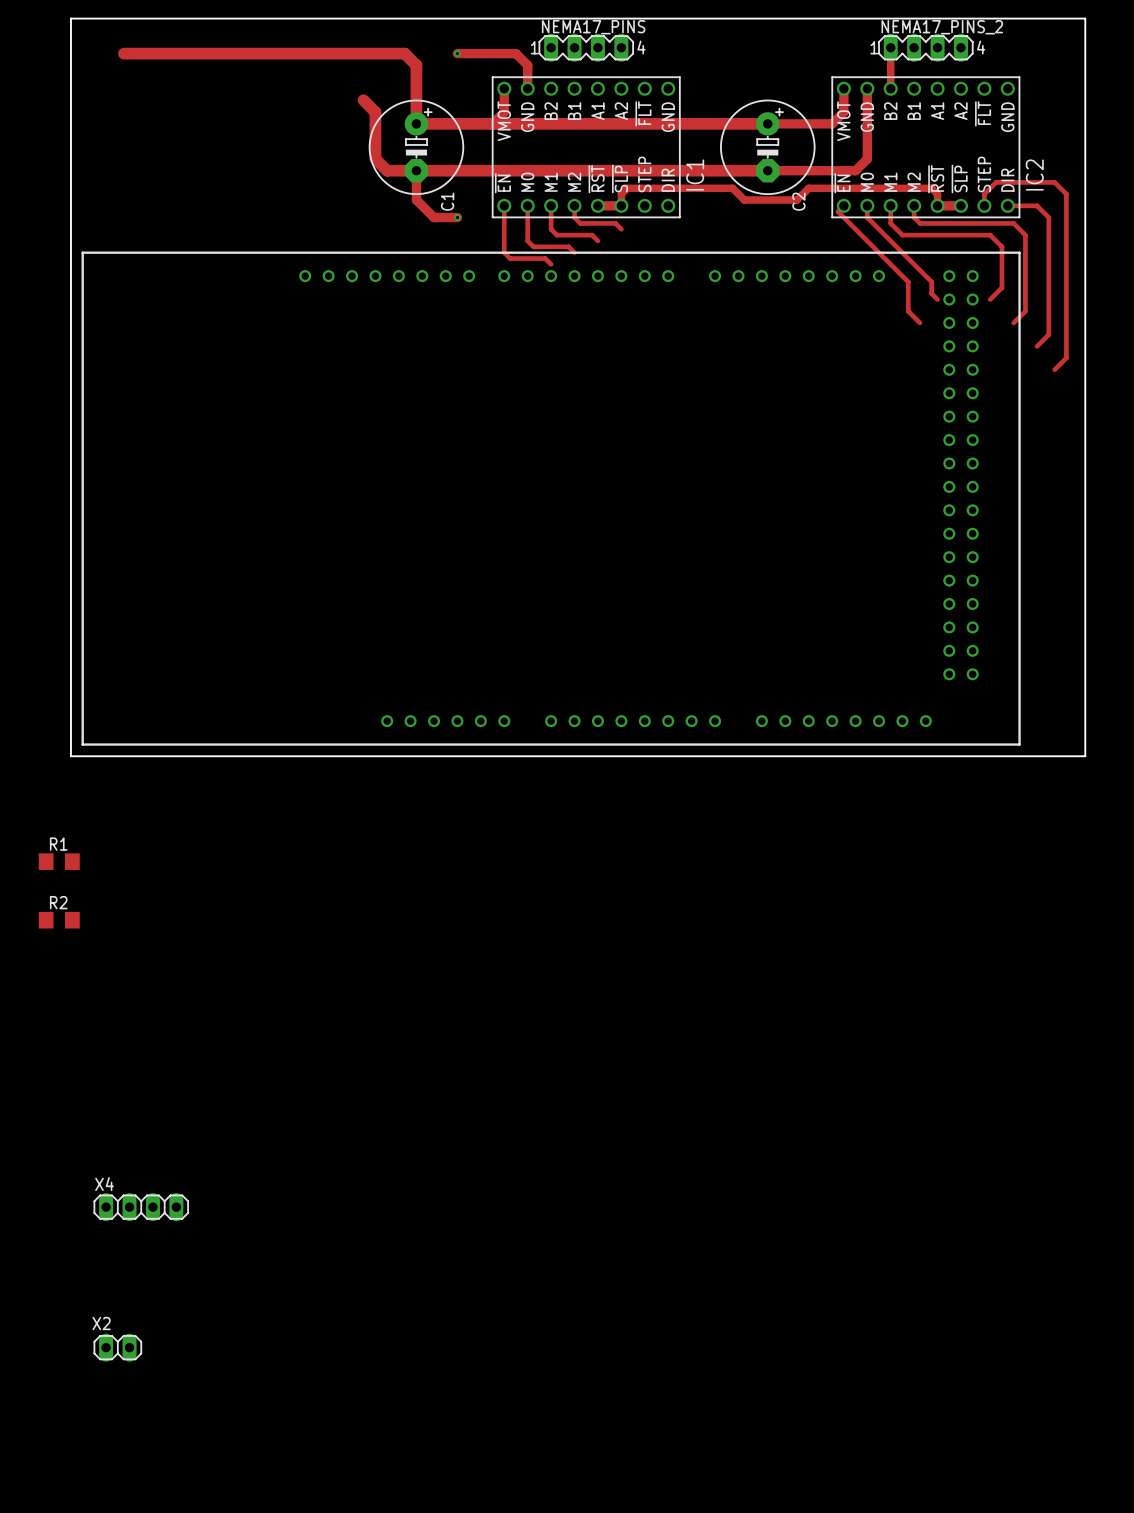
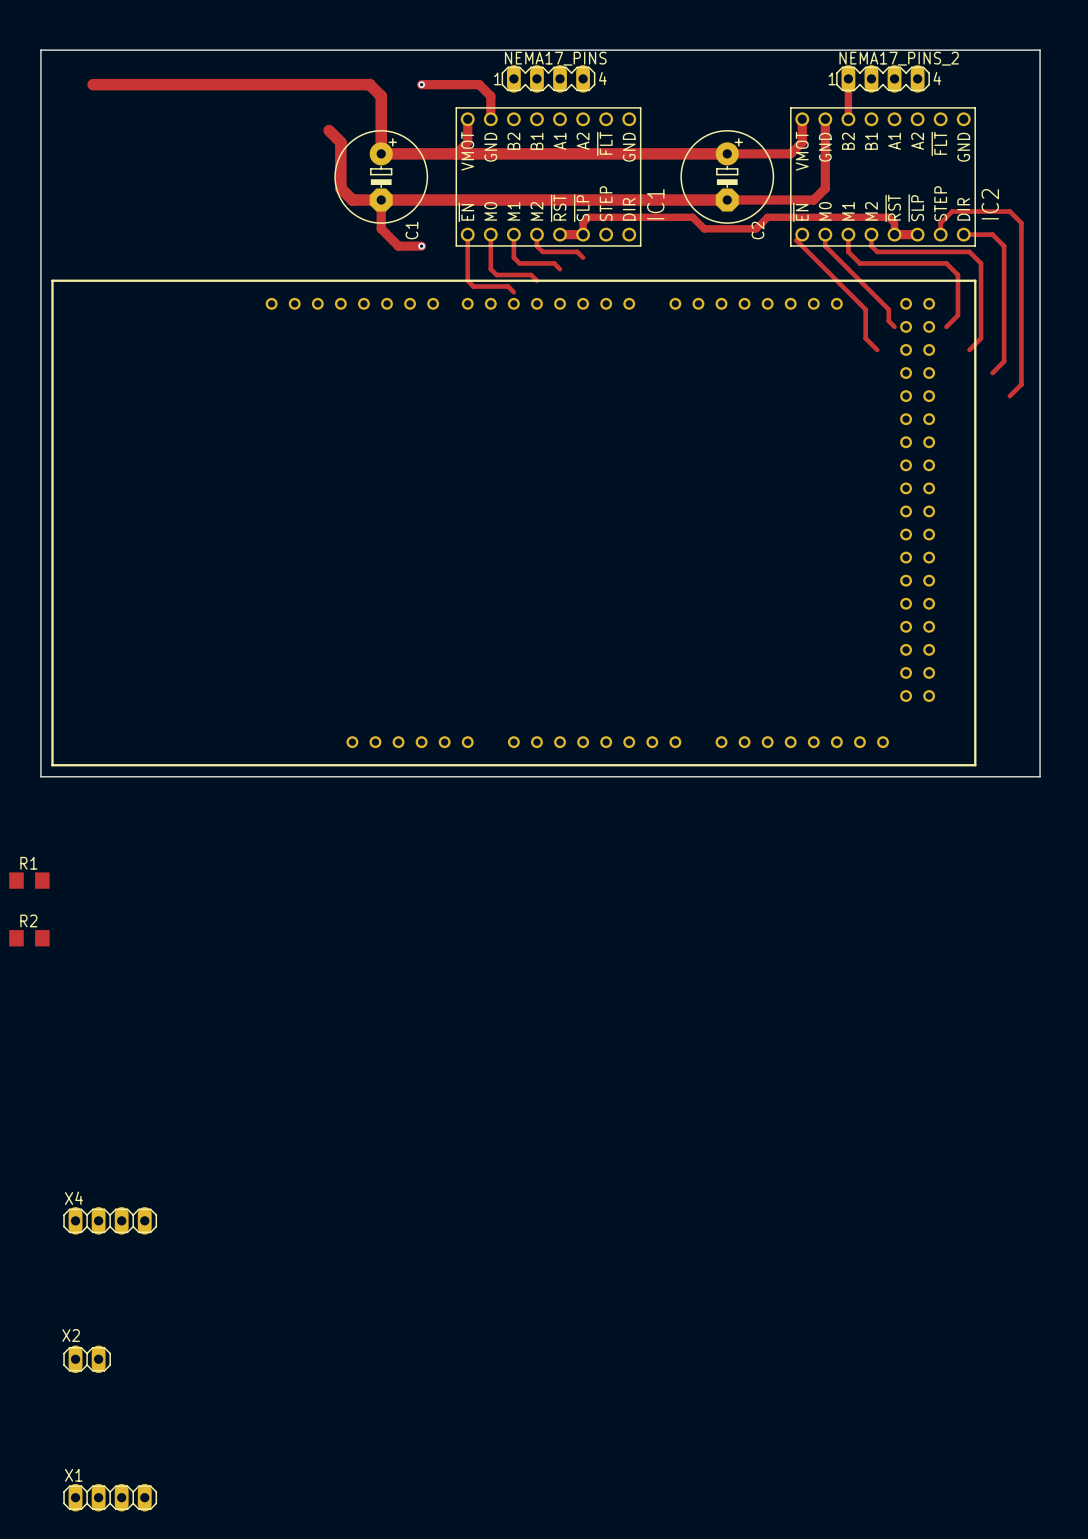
X1: none -> (110, 1497)

